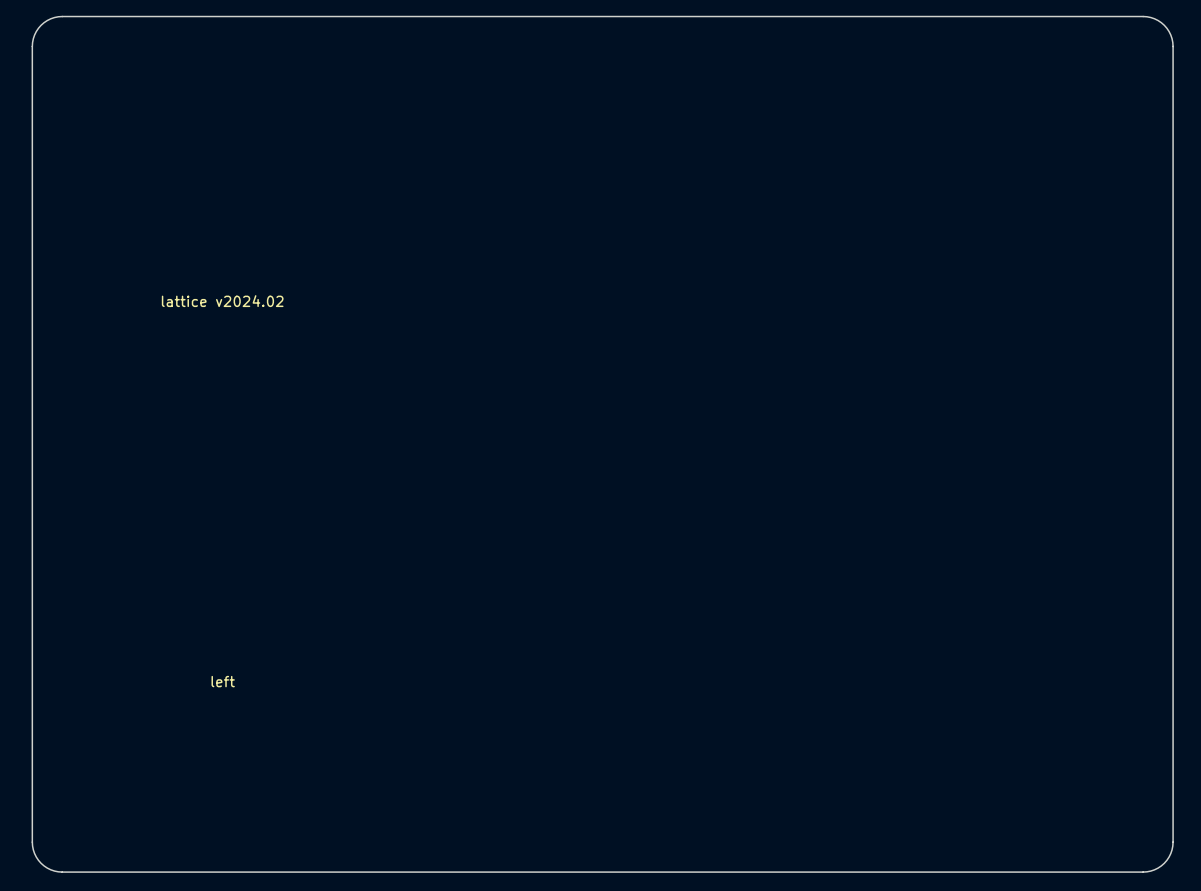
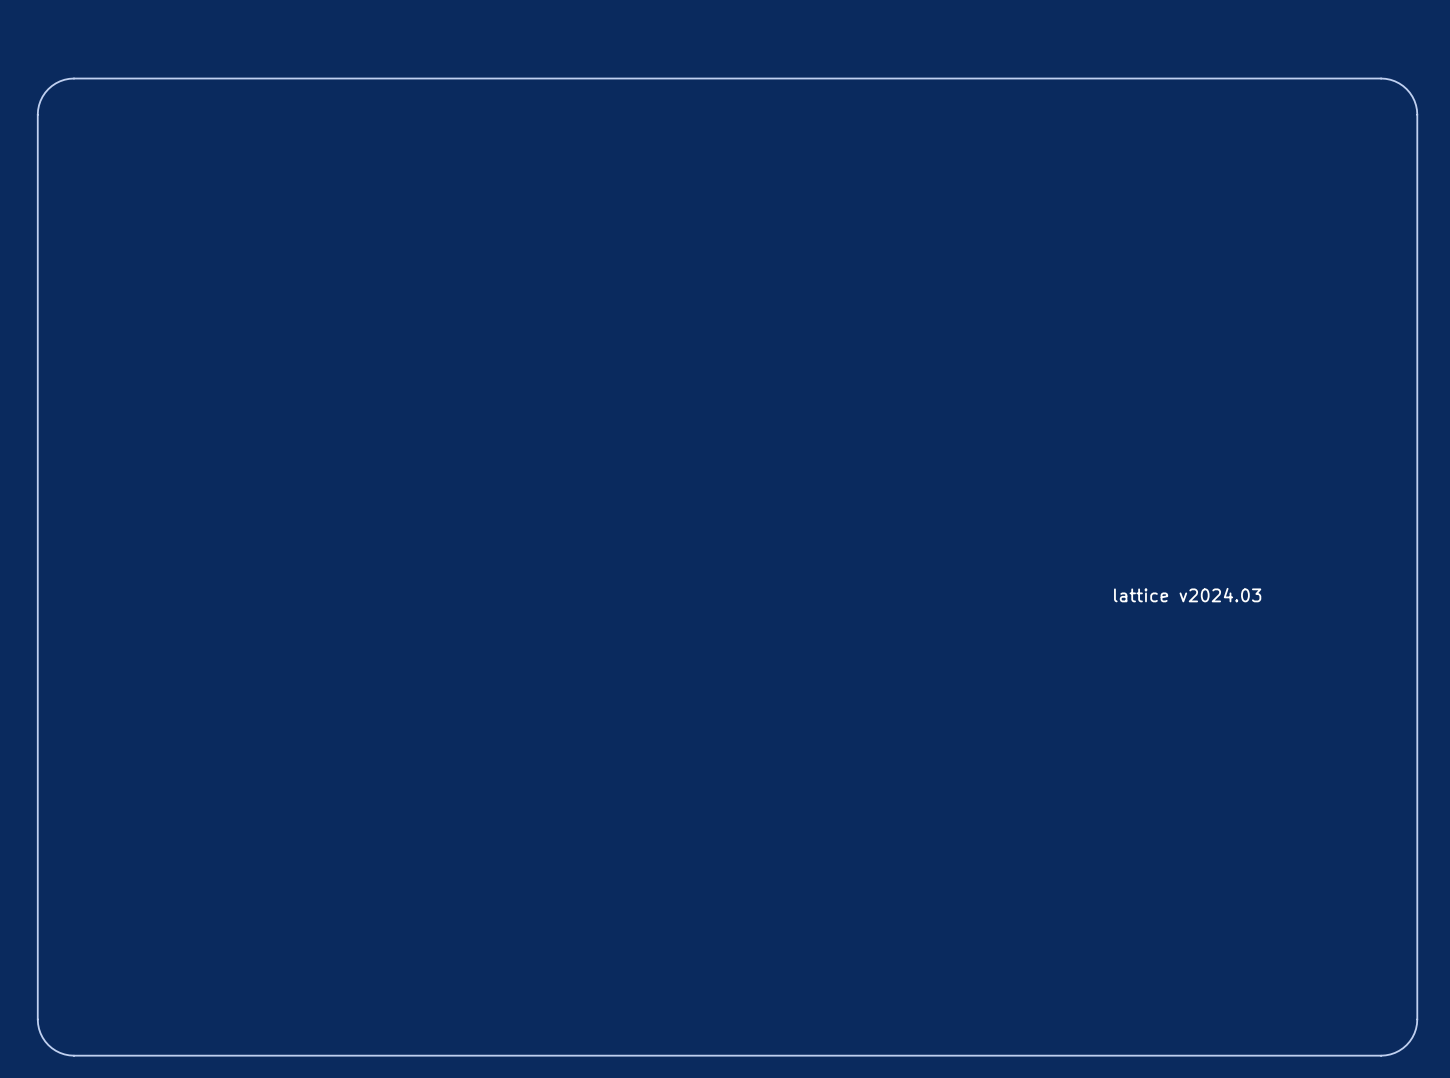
board edge: (1173, 94) (1173, 46) (1170, 35) (1164, 25) (1158, 20) (1143, 16) (58, 16) (44, 22) (38, 28) (33, 38) (32, 94) -> (1417, 114) (1414, 100) (1406, 89) (1394, 81) (1381, 78) (73, 78) (60, 81) (48, 89) (40, 100) (37, 114)
text: lattice v2024.02 (222, 301) -> none
text: none -> lattice v2024.03 (1187, 595)
text: left (223, 681) -> none

